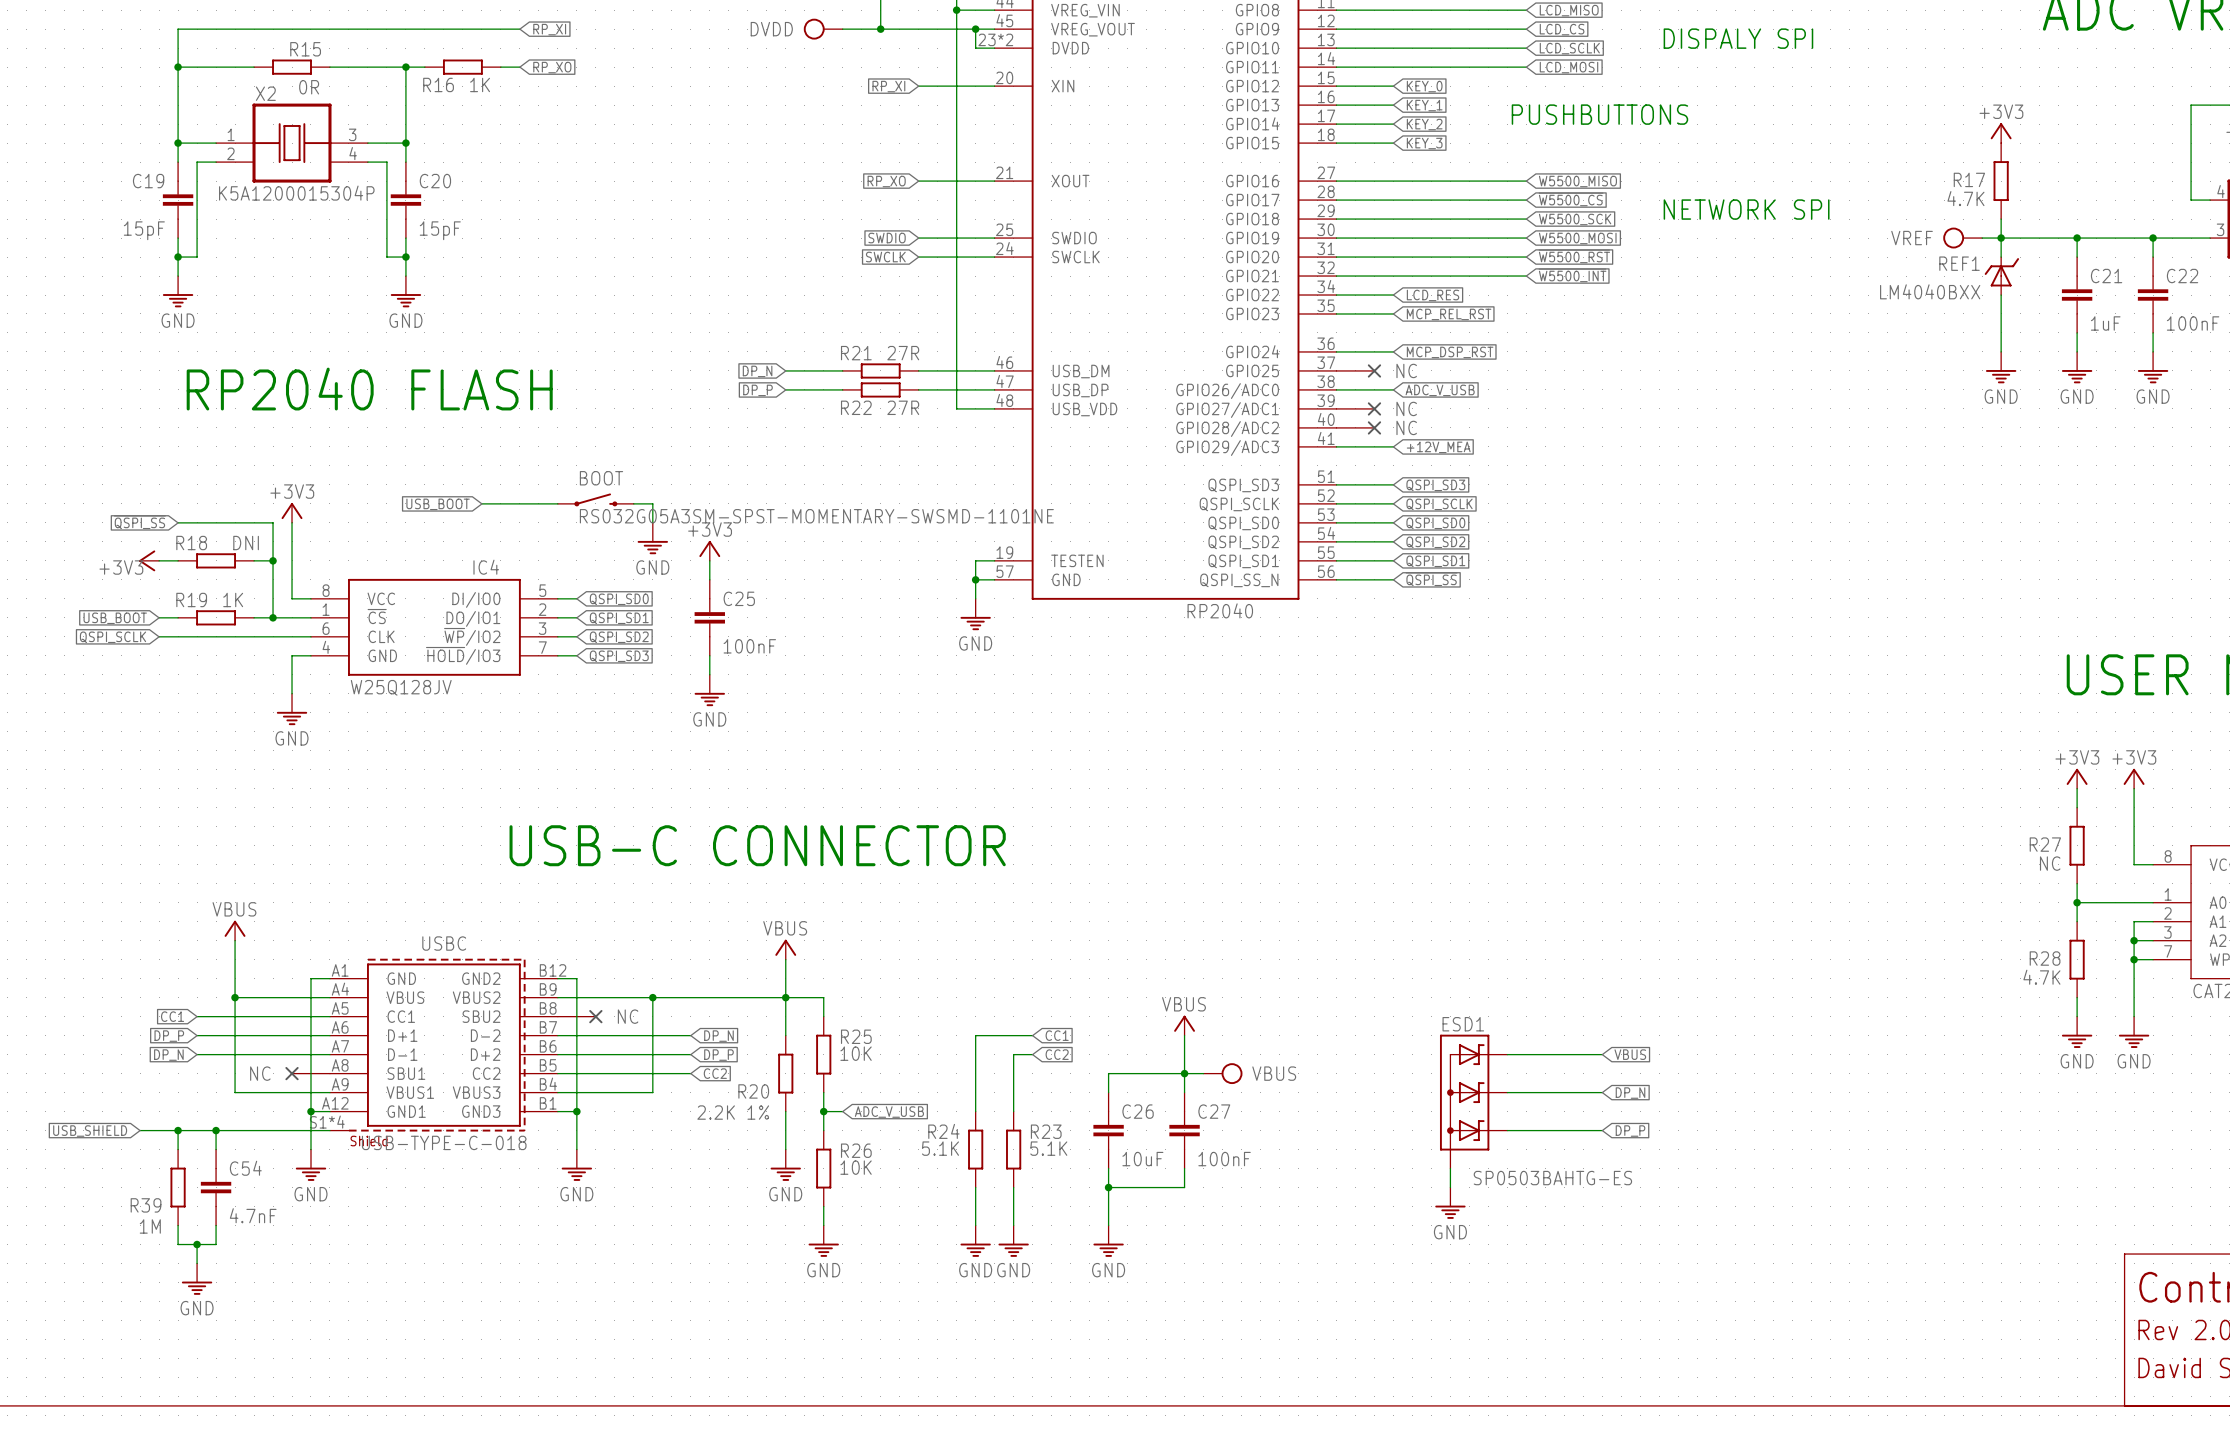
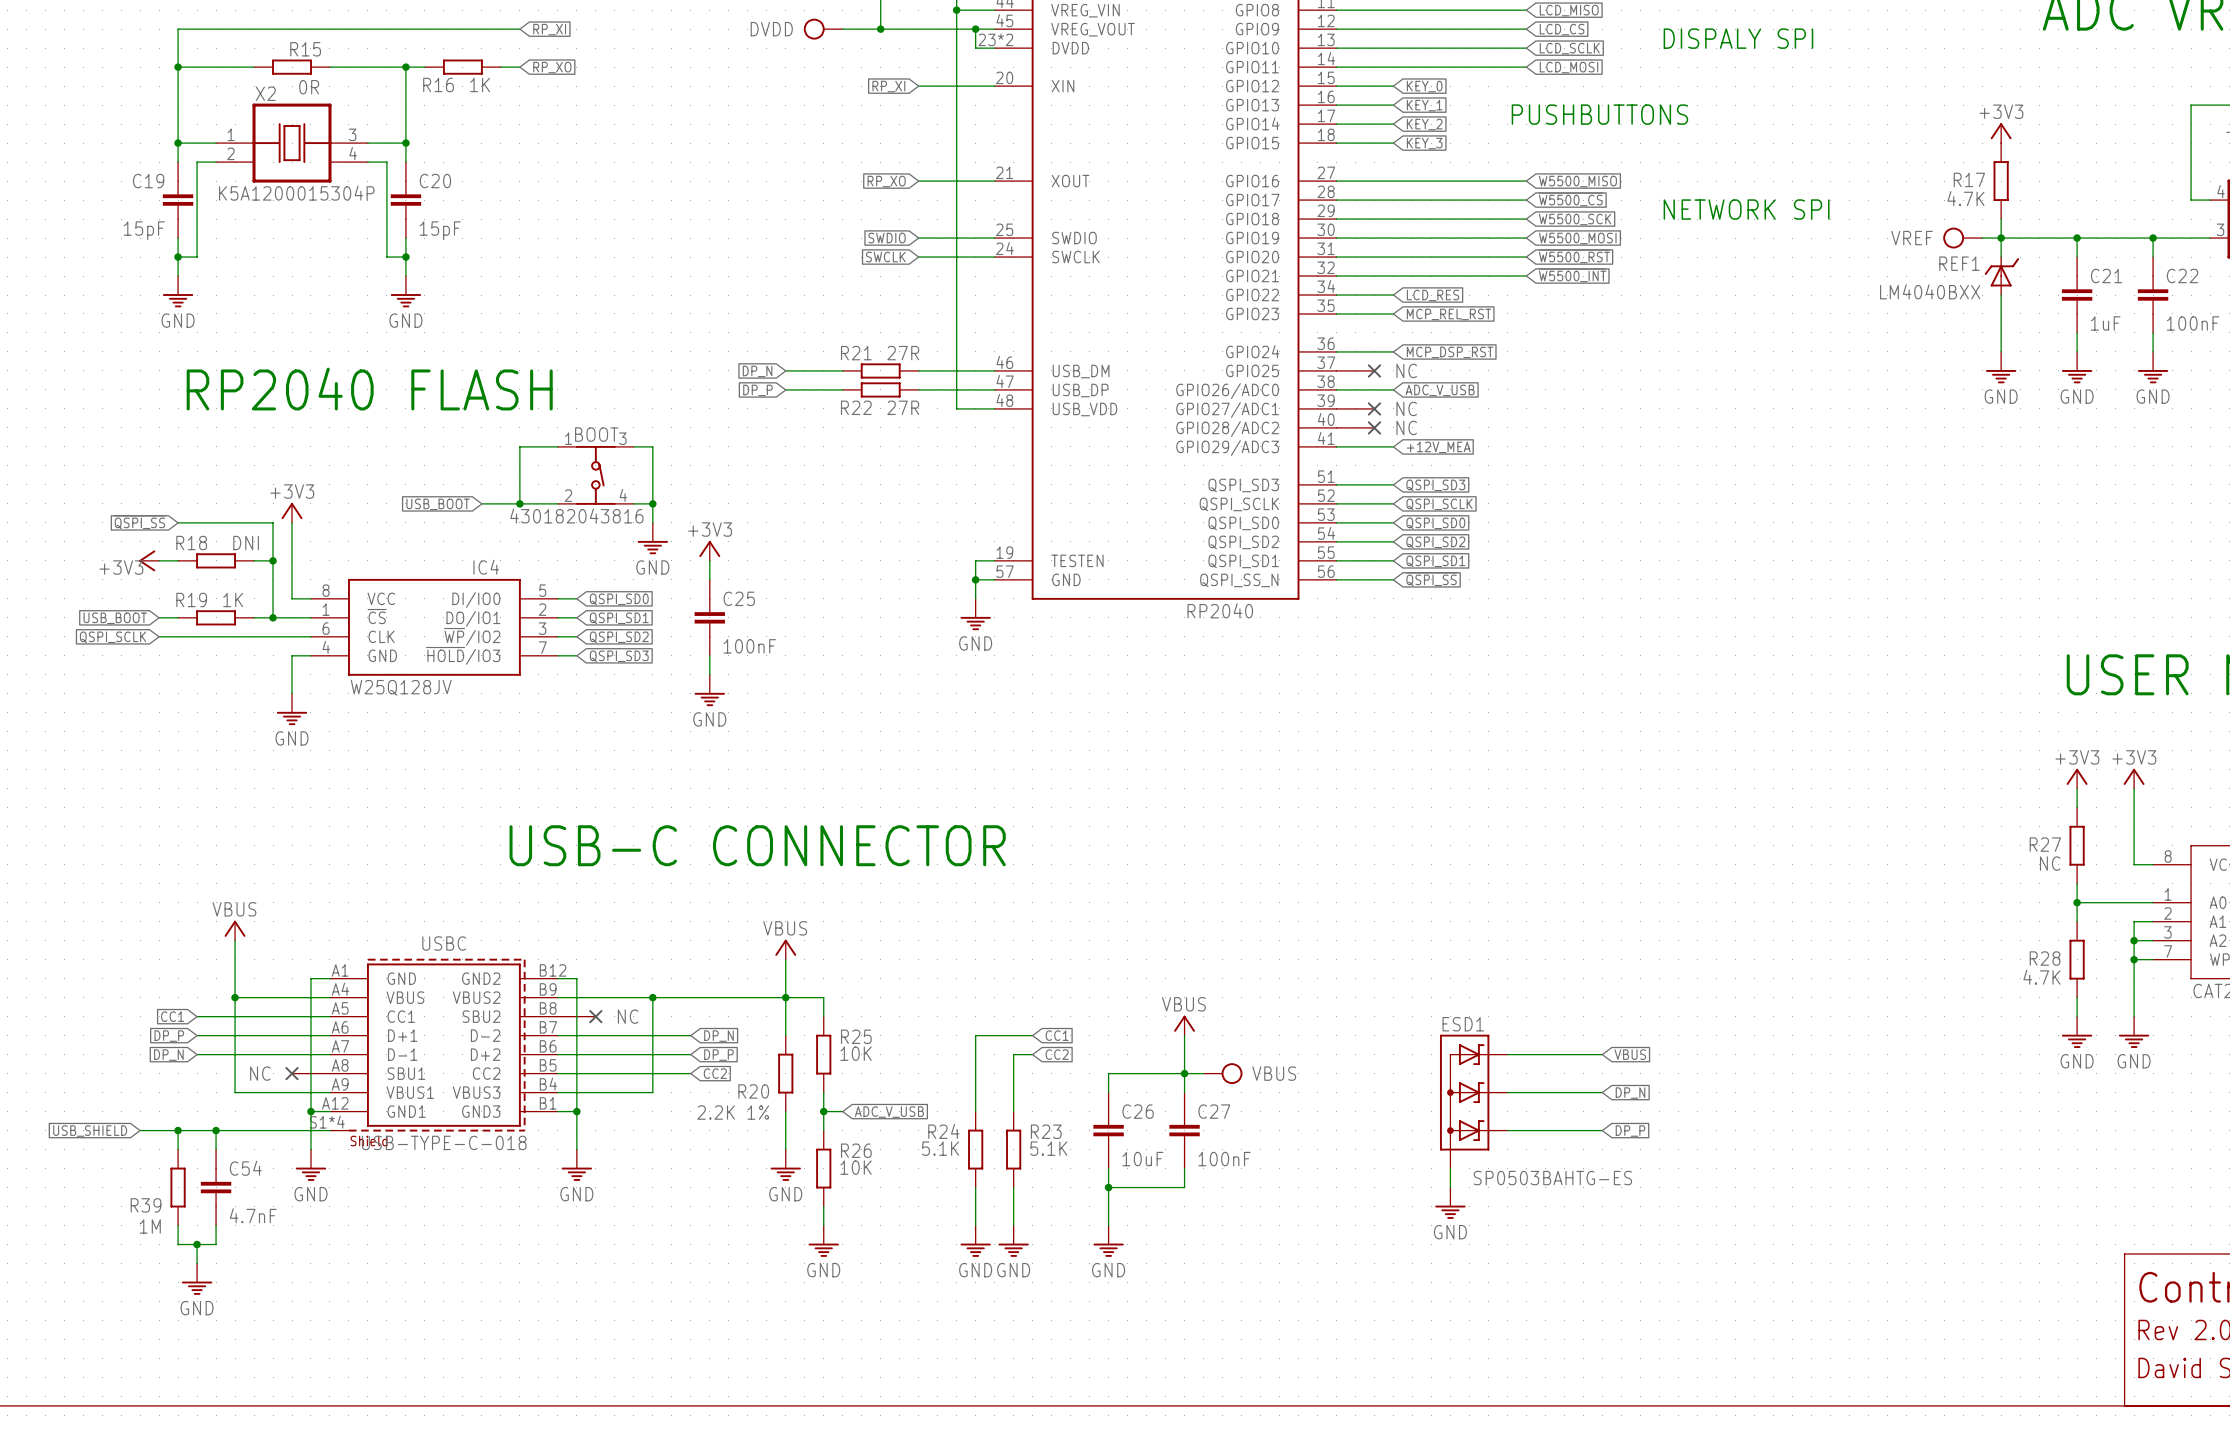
wire: none -> (557, 446) (519, 446) (519, 503)
wire: none -> (633, 446) (652, 446) (652, 503)
BOOT: none -> 430182043816 (595, 475)
BOOT: RS032G05A3SM-SPST-MOMENTARY-SWSMD-1101NE (595, 499) -> none
junction: none -> (519, 503)
junction: none -> (652, 503)

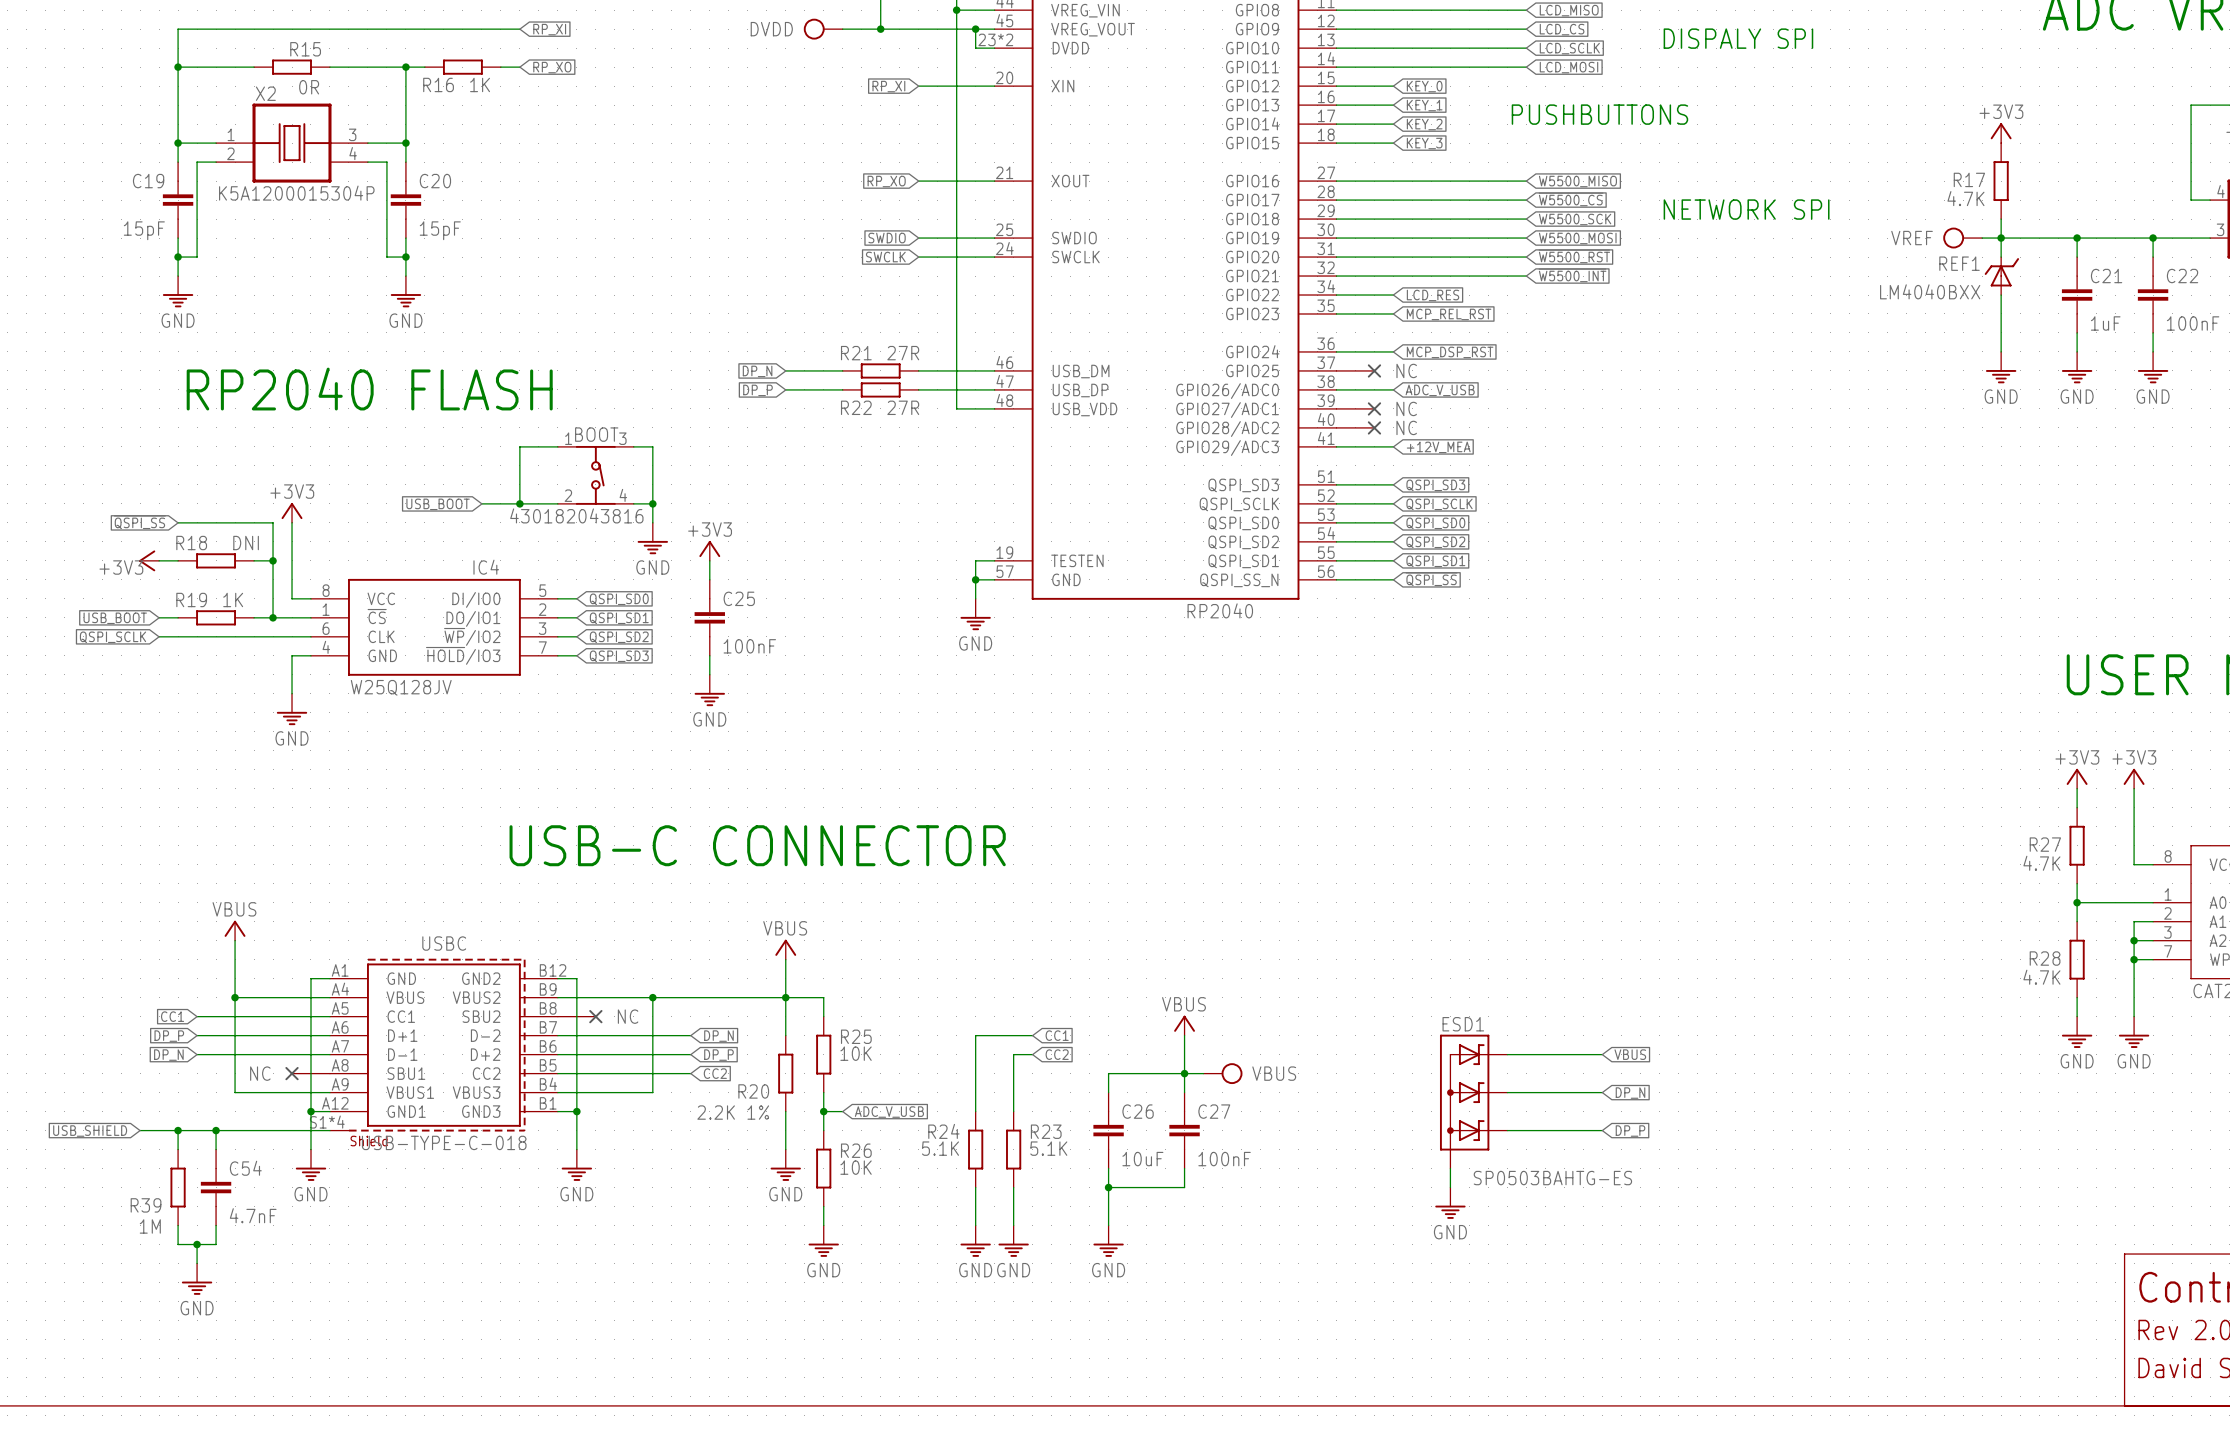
R27 value: NC (2050, 863) -> 4.7K (2041, 863)

